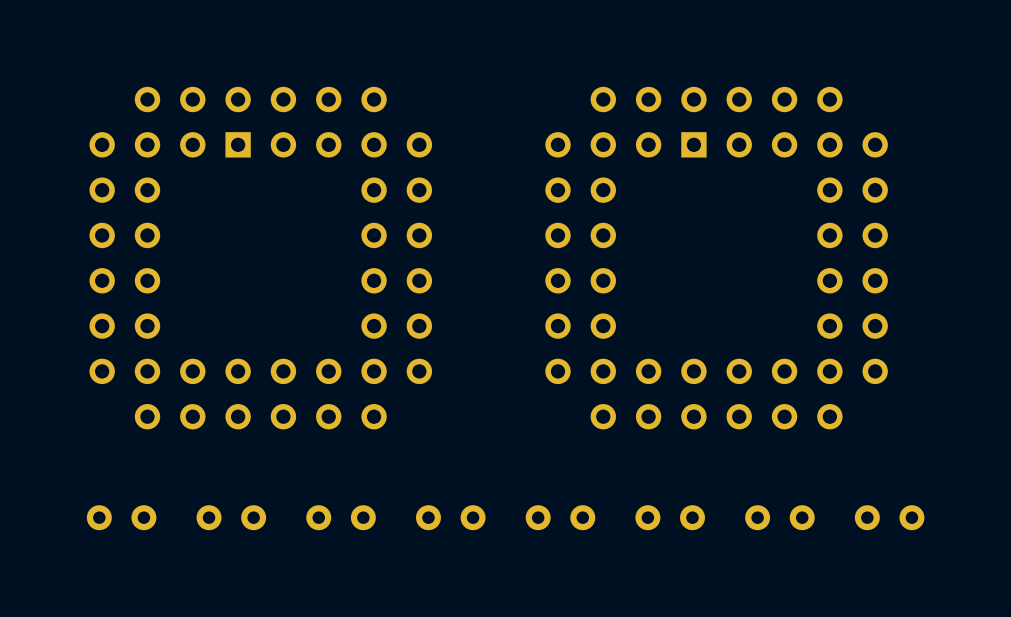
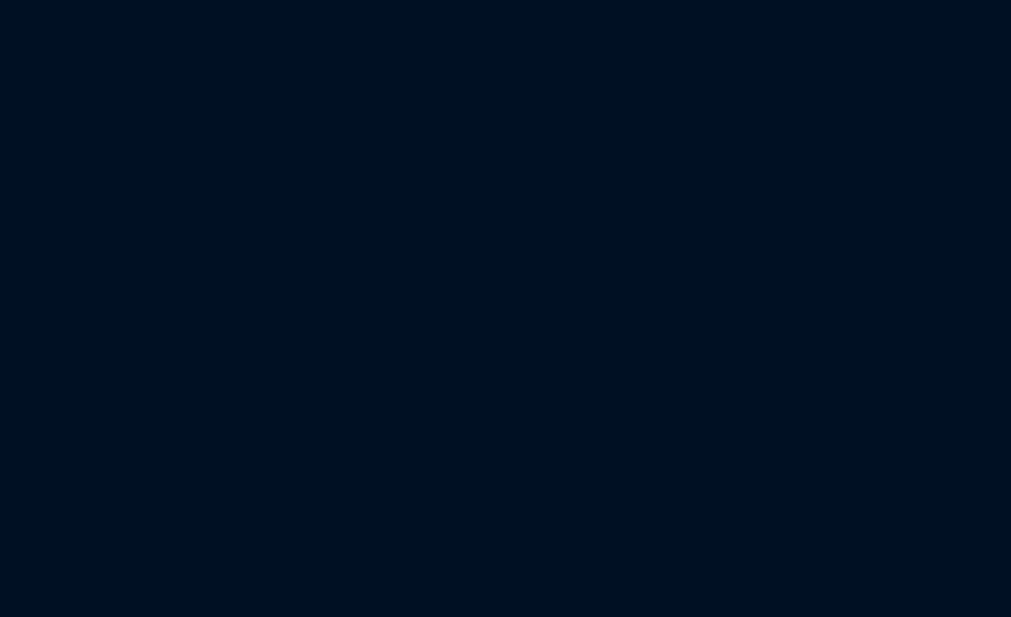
part: (260, 258) -> none
part: (716, 258) -> none
part: (121, 517) -> none
part: (231, 517) -> none
part: (341, 517) -> none
part: (450, 517) -> none
part: (560, 517) -> none
part: (670, 517) -> none
part: (779, 517) -> none
part: (889, 517) -> none

